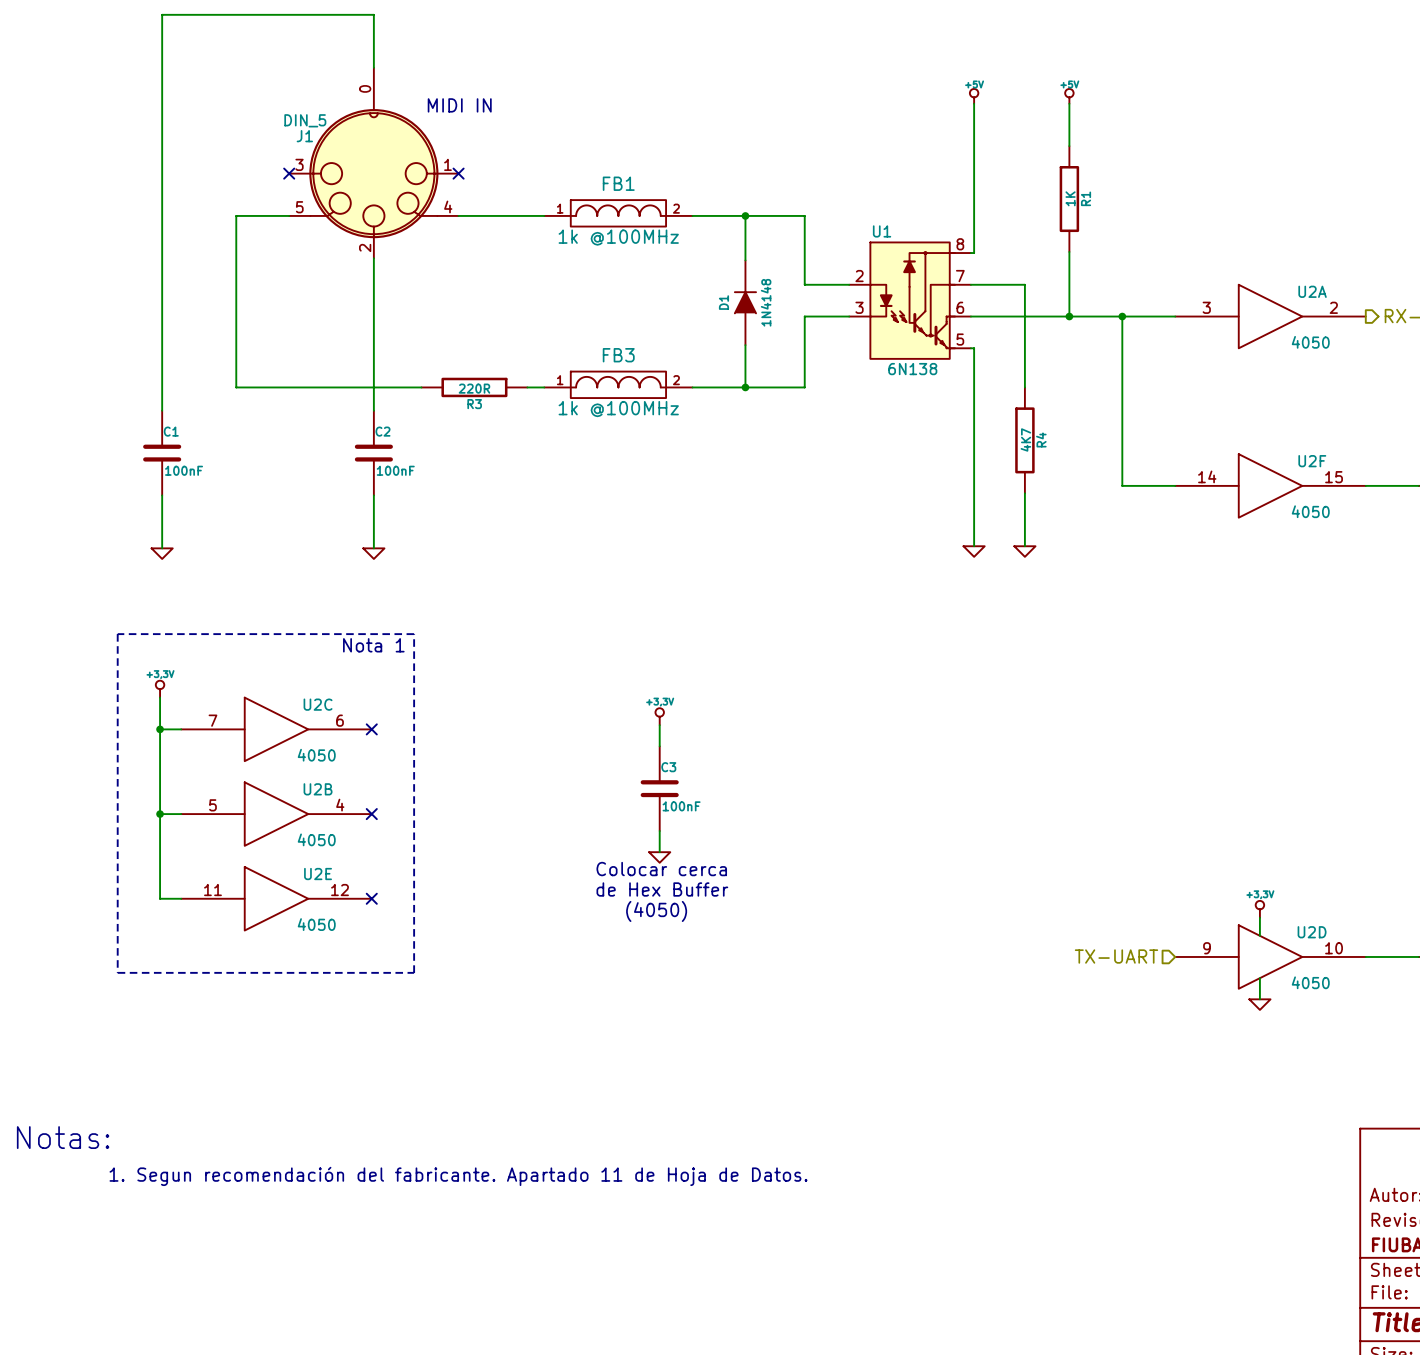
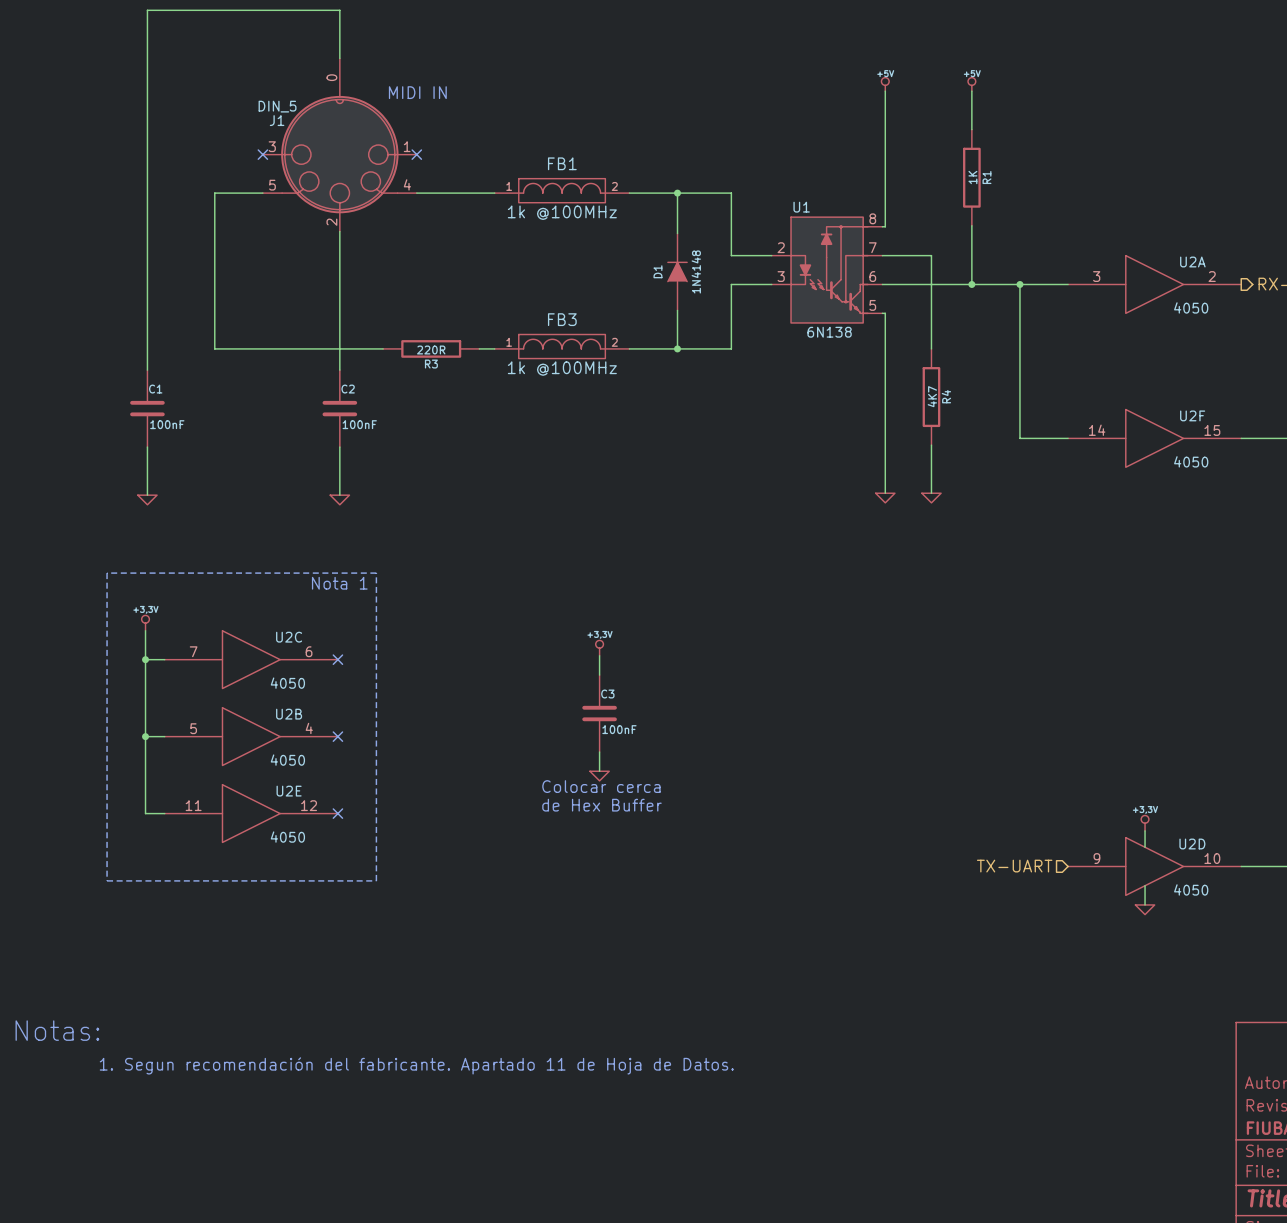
text: (4050) (656, 911) -> none

